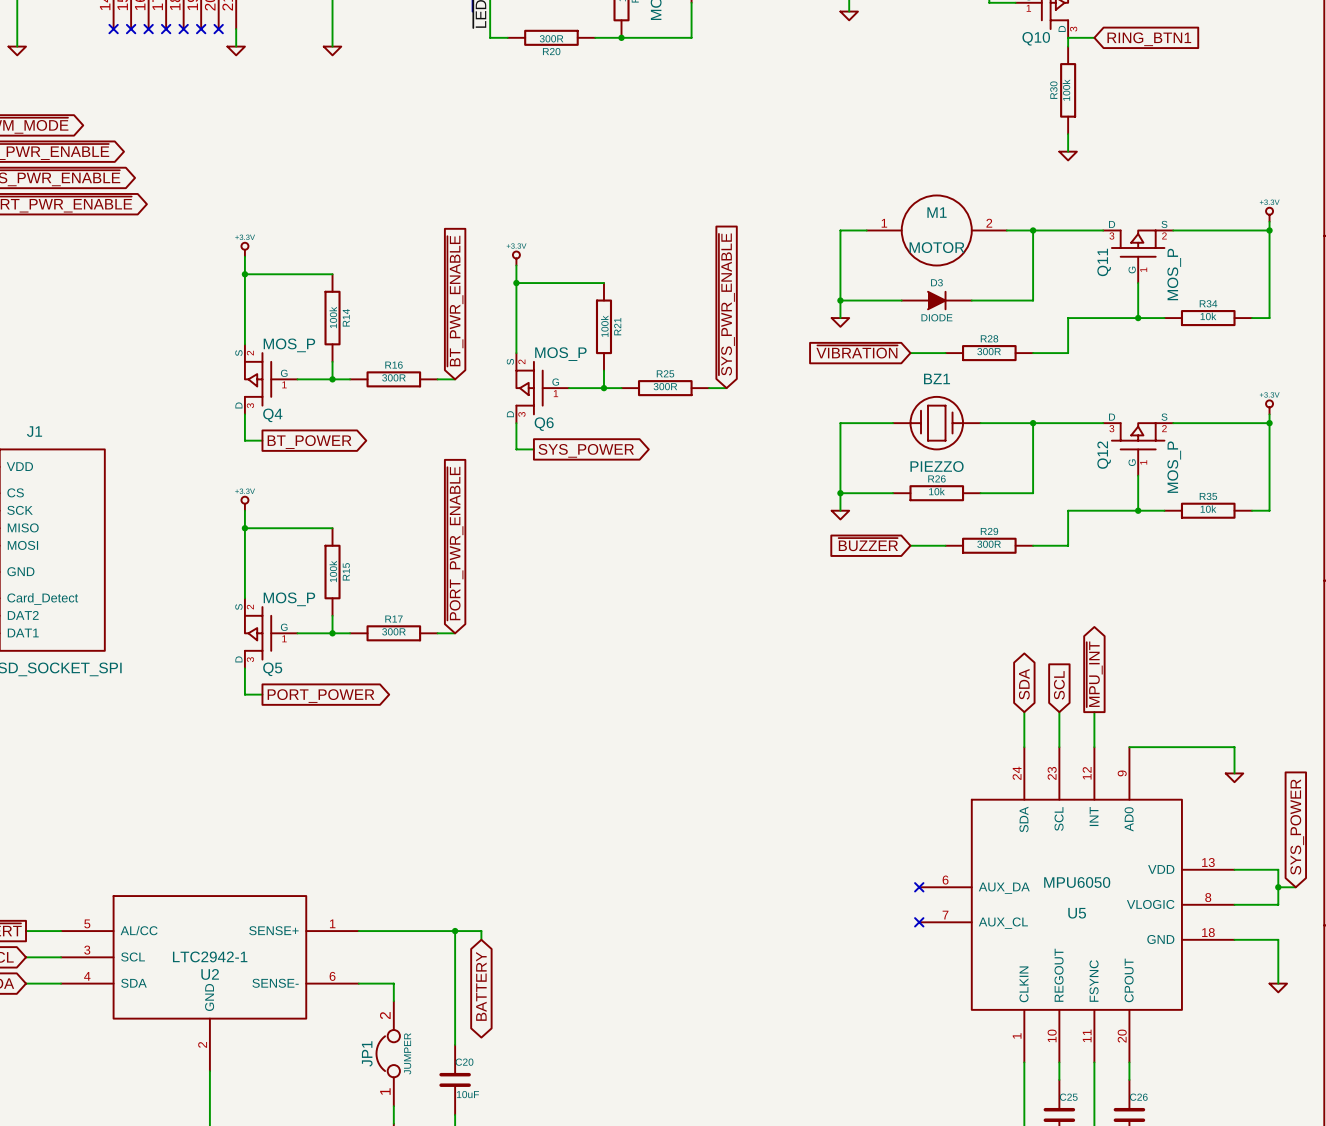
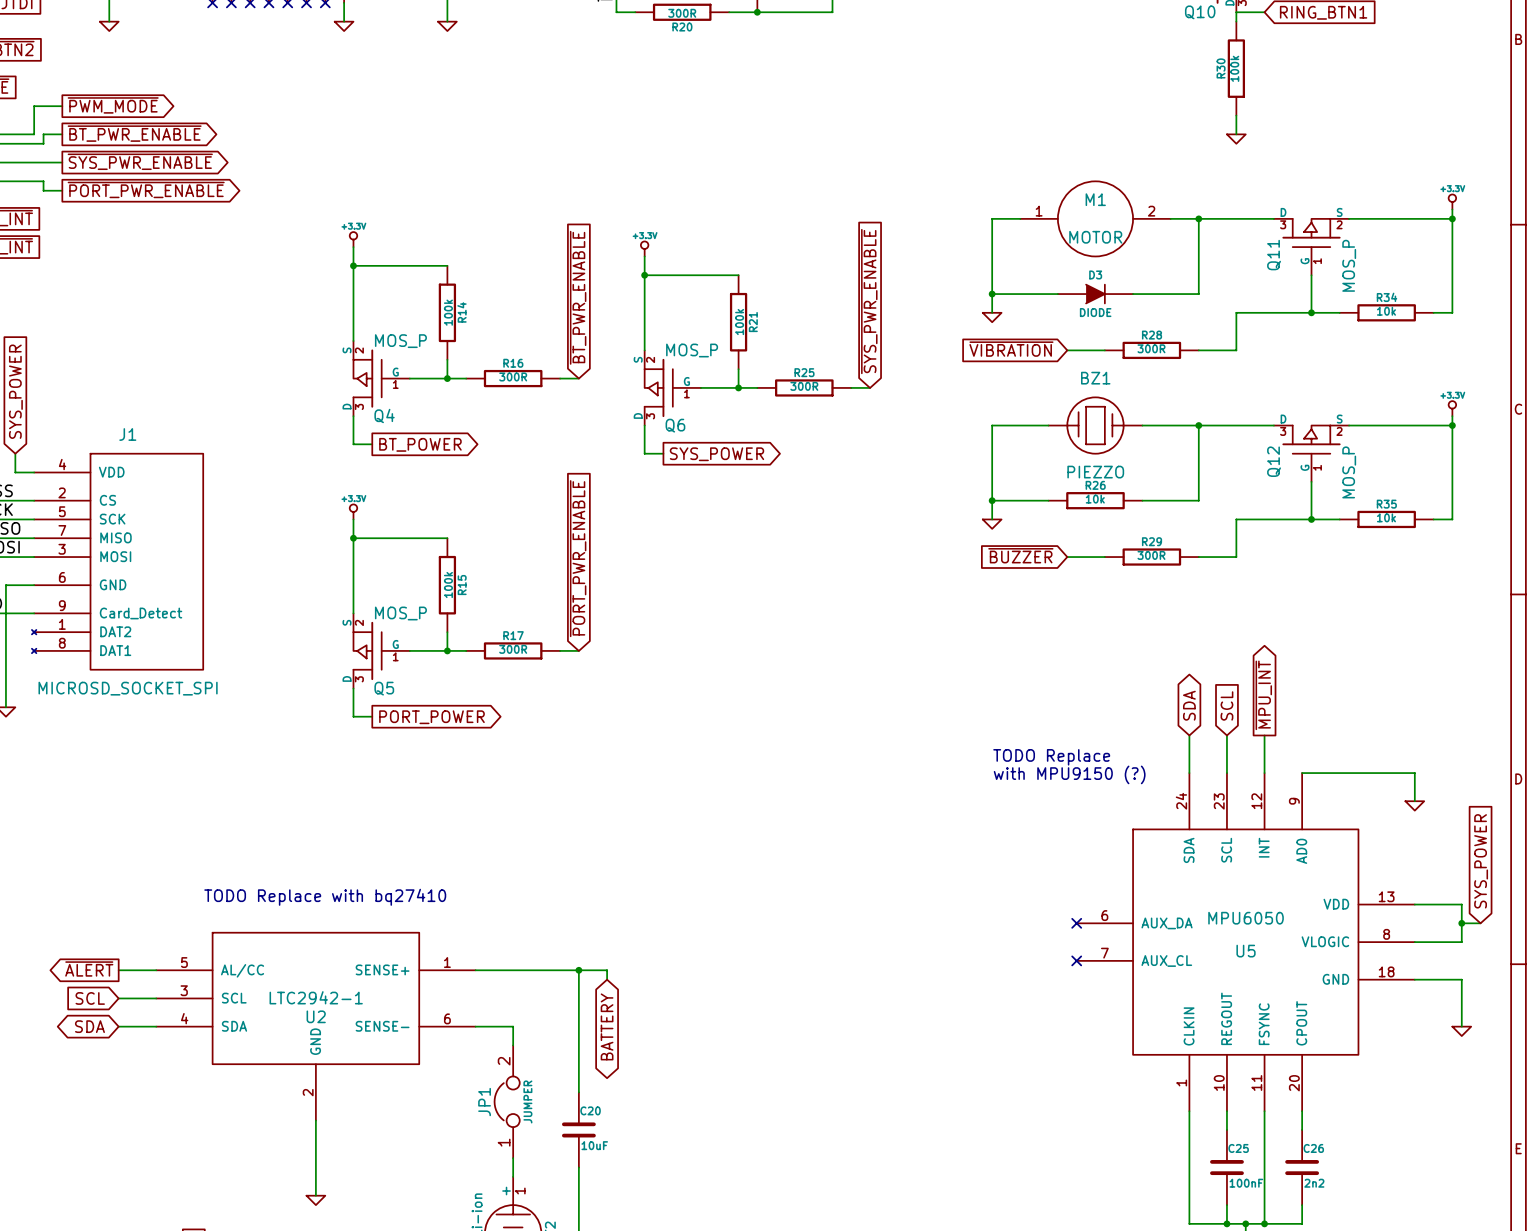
text: none -> TODO Replace (1051, 757)
text: none -> with MPU9150 (?) (1069, 774)
text: none -> TODO Replace with bq27410 (325, 897)

